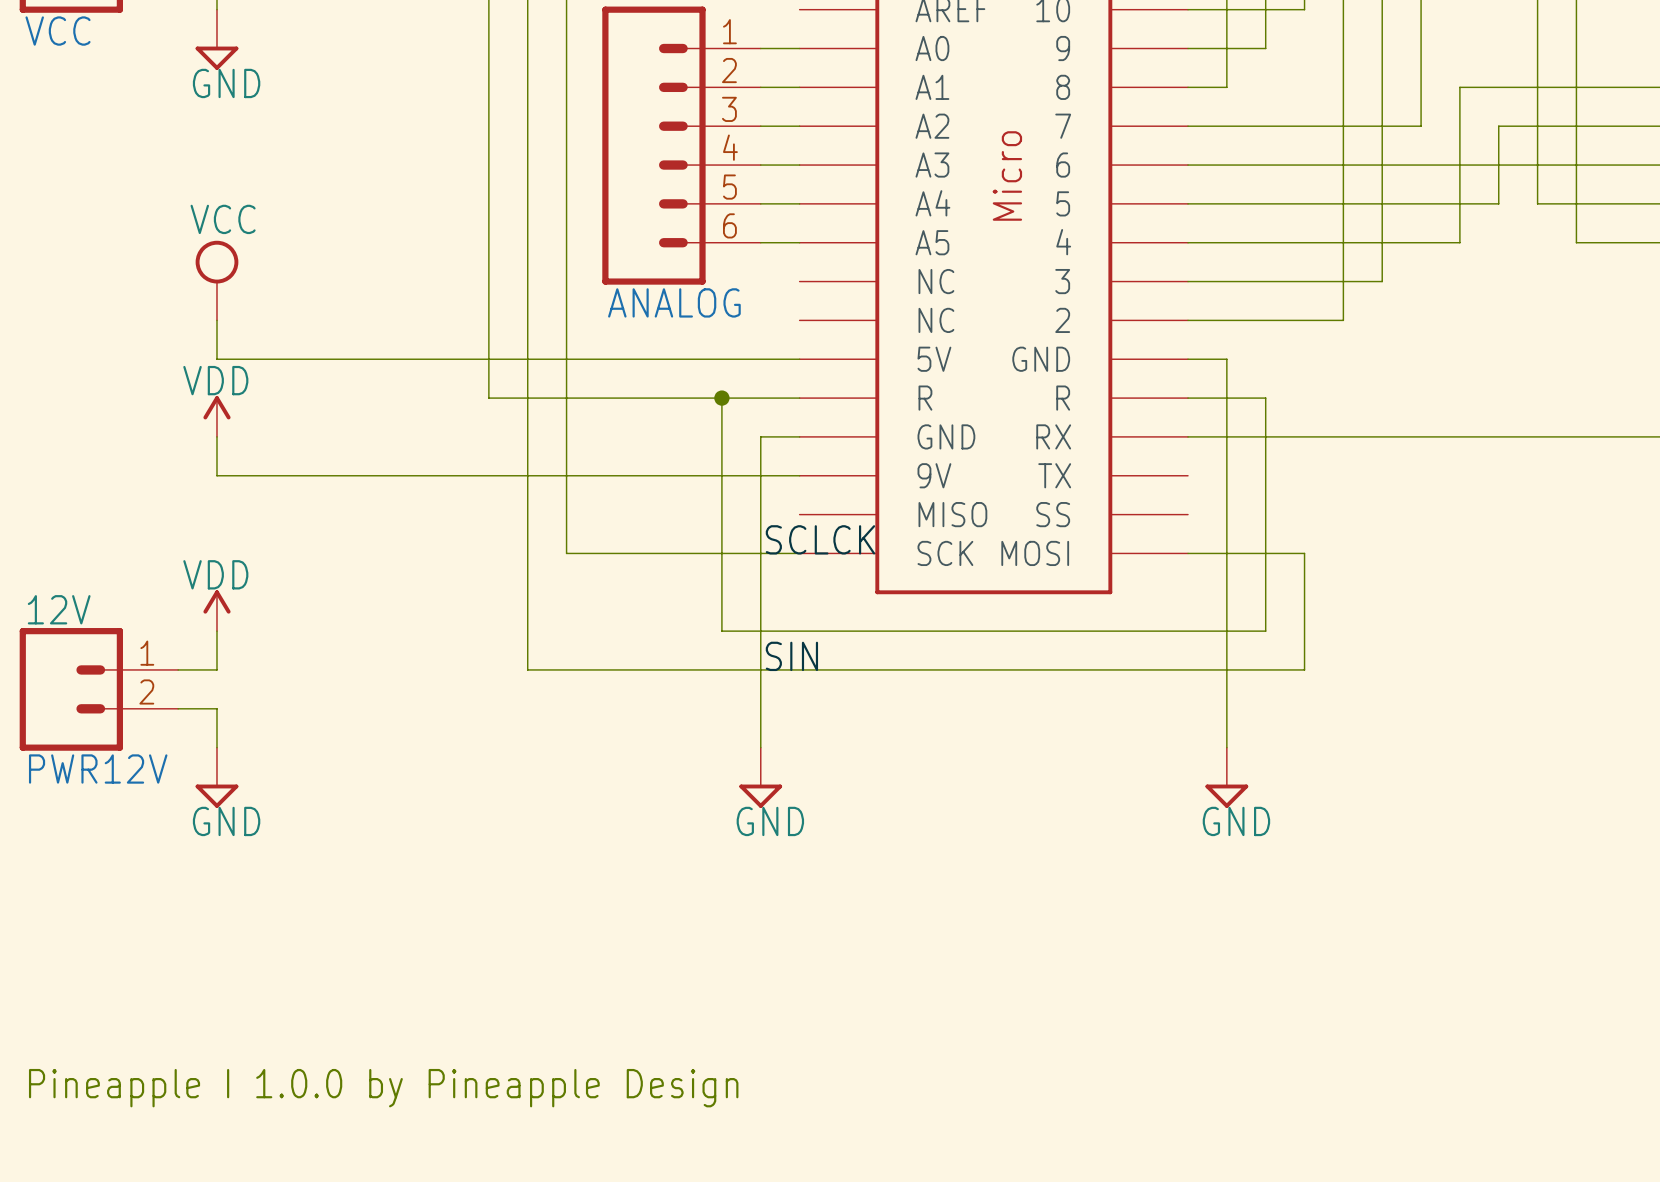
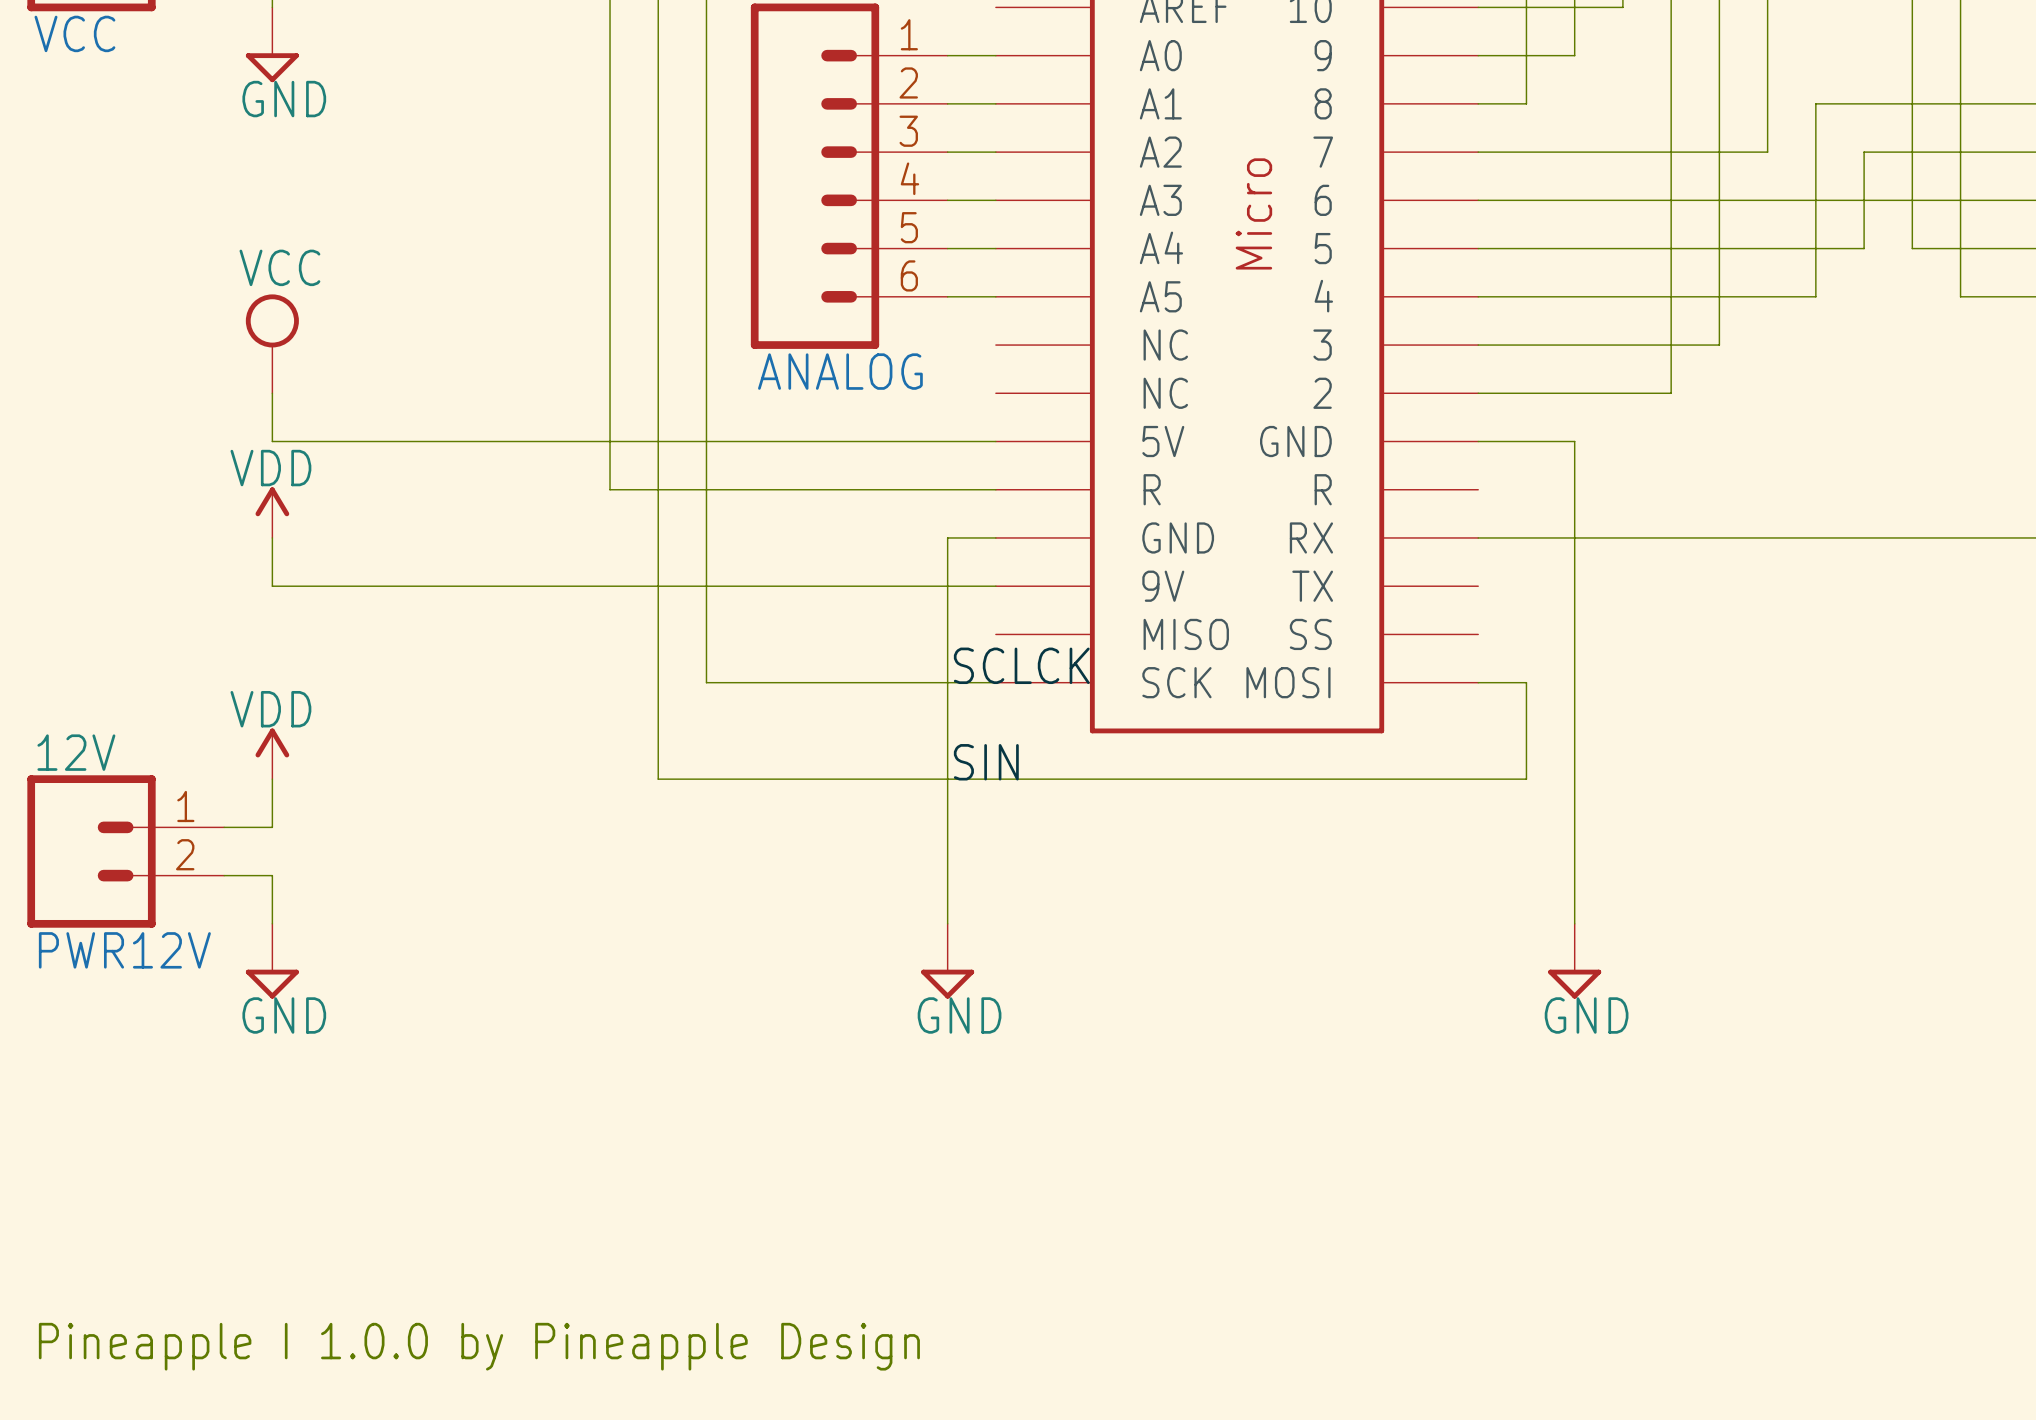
wire: (1226, 359) (1226, 553) (1304, 553) (1304, 669) (527, 669) (527, 631) -> none
wire: (721, 398) (721, 631) -> (658, 779) (899, 779)
junction: (721, 398) -> none
wire: (1188, 398) (1265, 398) -> (1526, 441) (1574, 441) (1574, 489)
wire: (1265, 631) (1226, 631) (1226, 747) -> (1574, 779) (1574, 923)
label position: SIN (791, 656) -> SIN (986, 762)
power symbol position: GND (1226, 777) -> GND (1574, 961)

